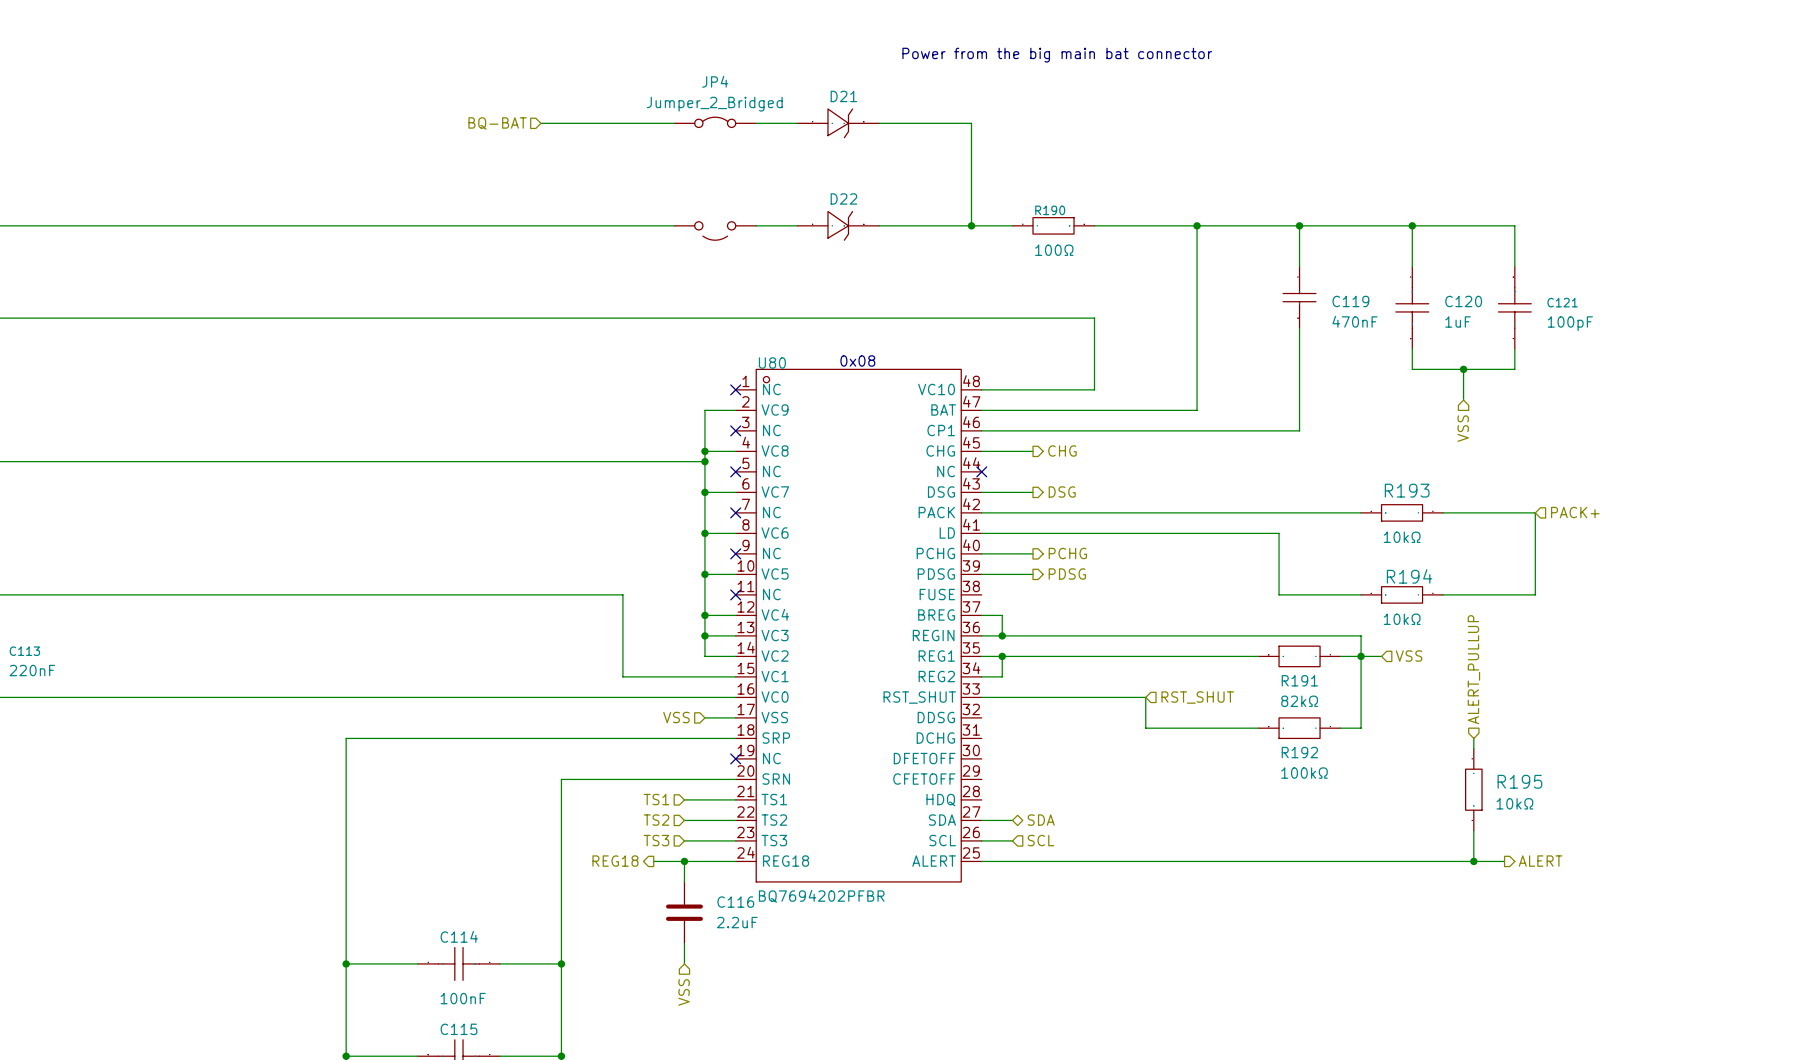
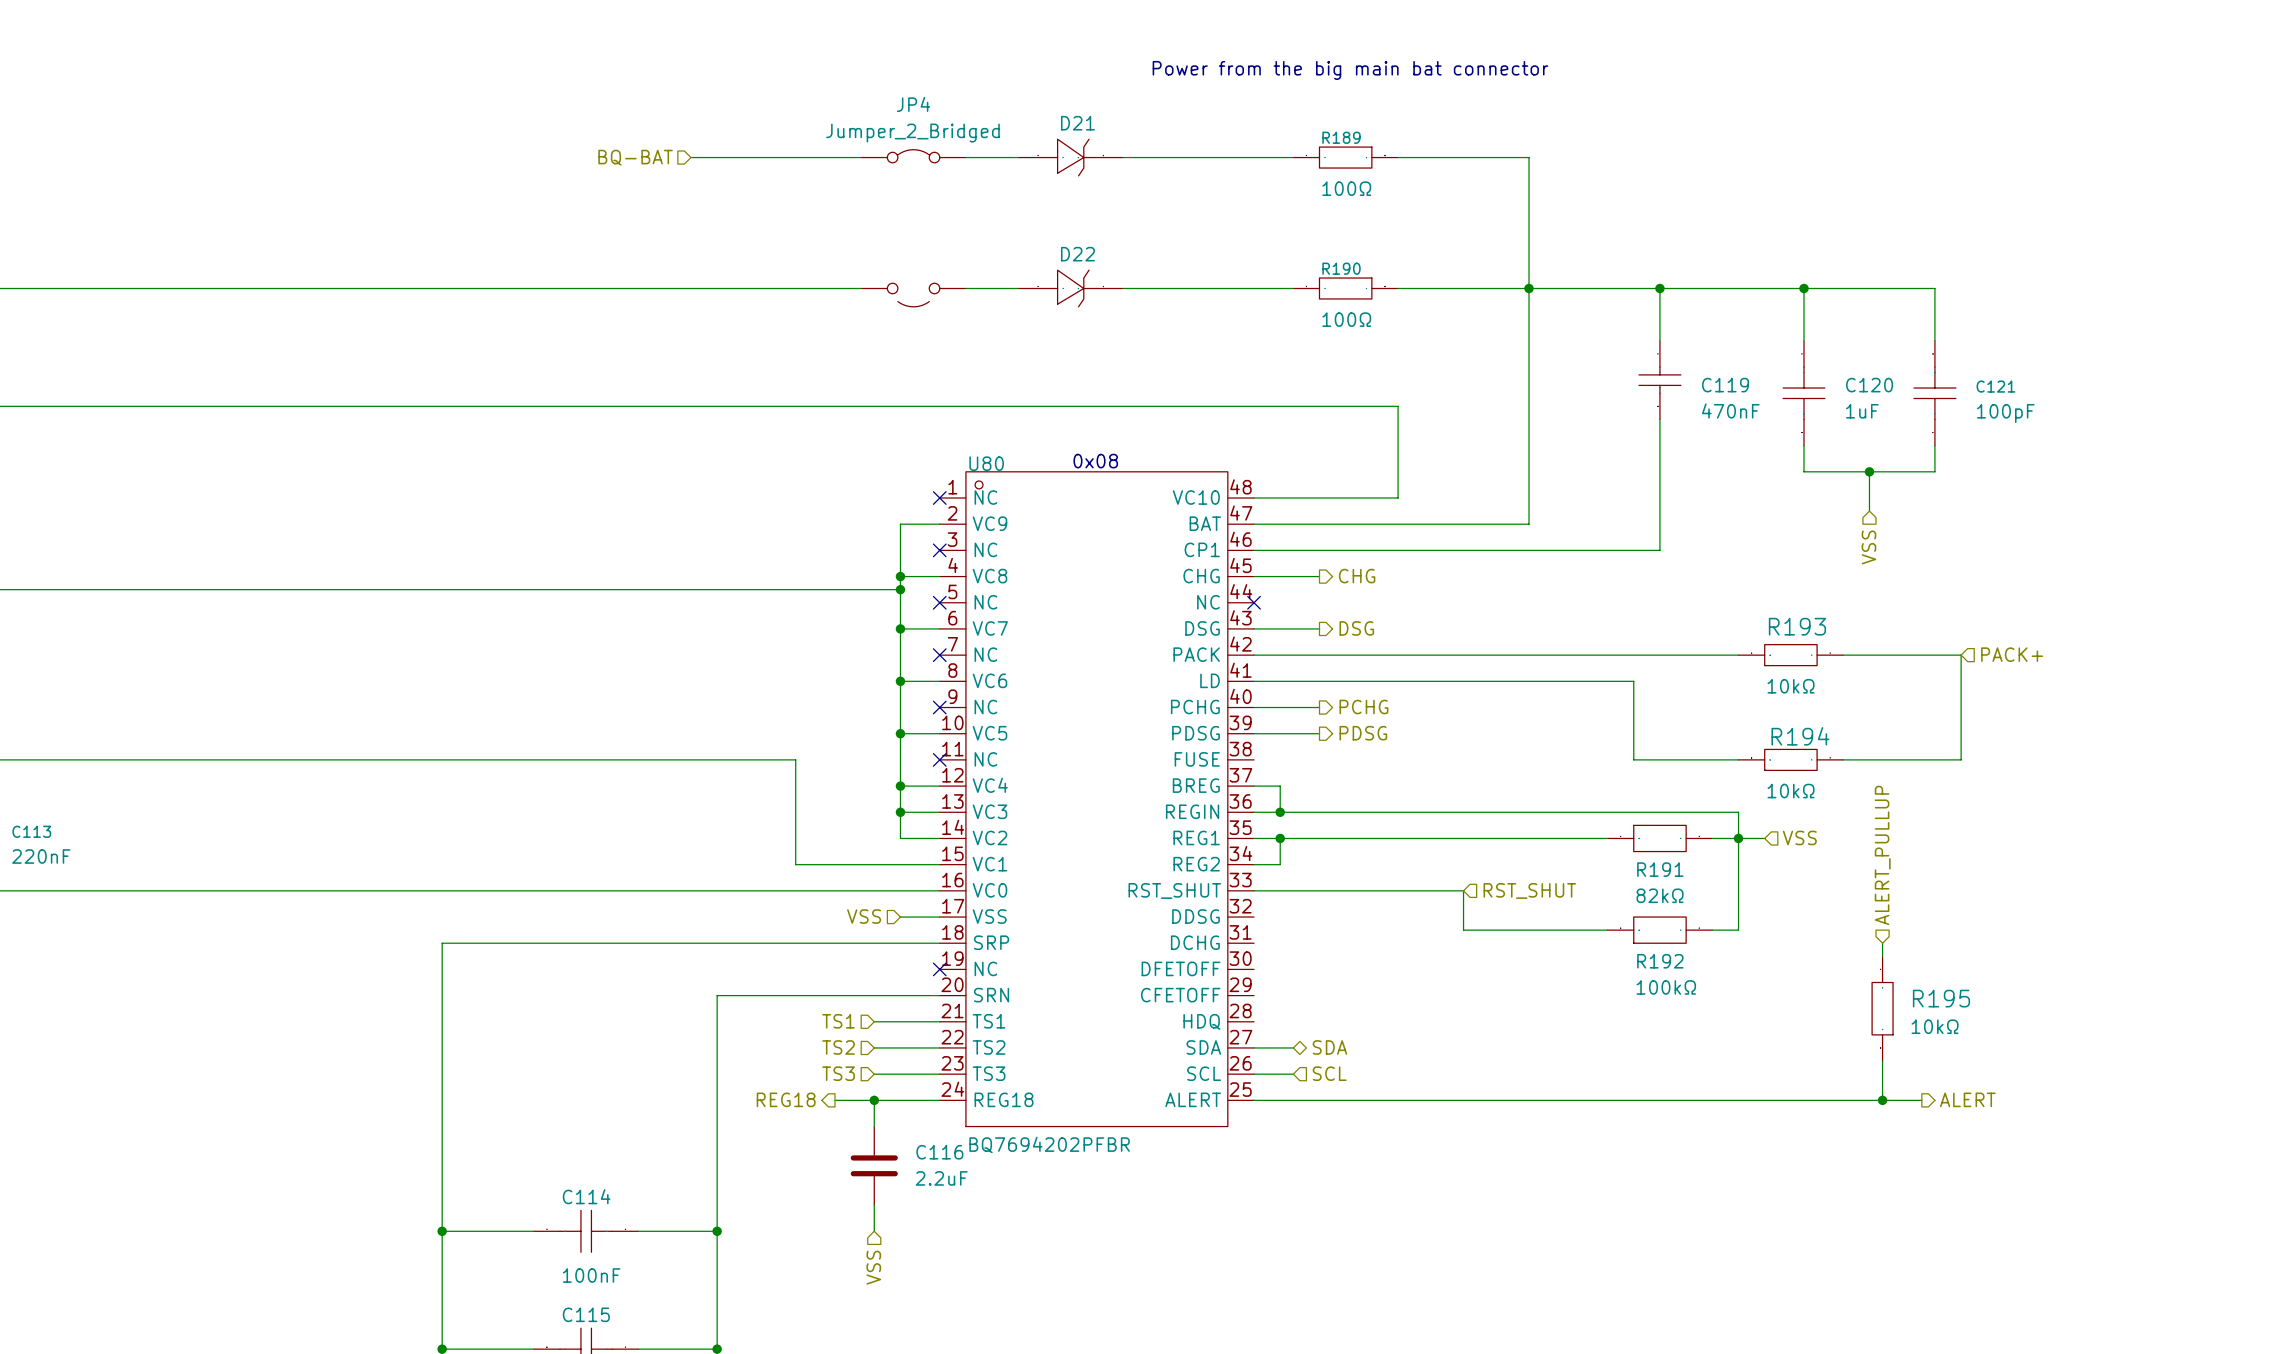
wire: (971, 123) (971, 225) -> (1240, 157) (1293, 157)
R189: none -> 100Ω (1345, 157)
wire: none -> (1398, 157) (1529, 157) (1529, 288)
junction: (971, 225) -> none

